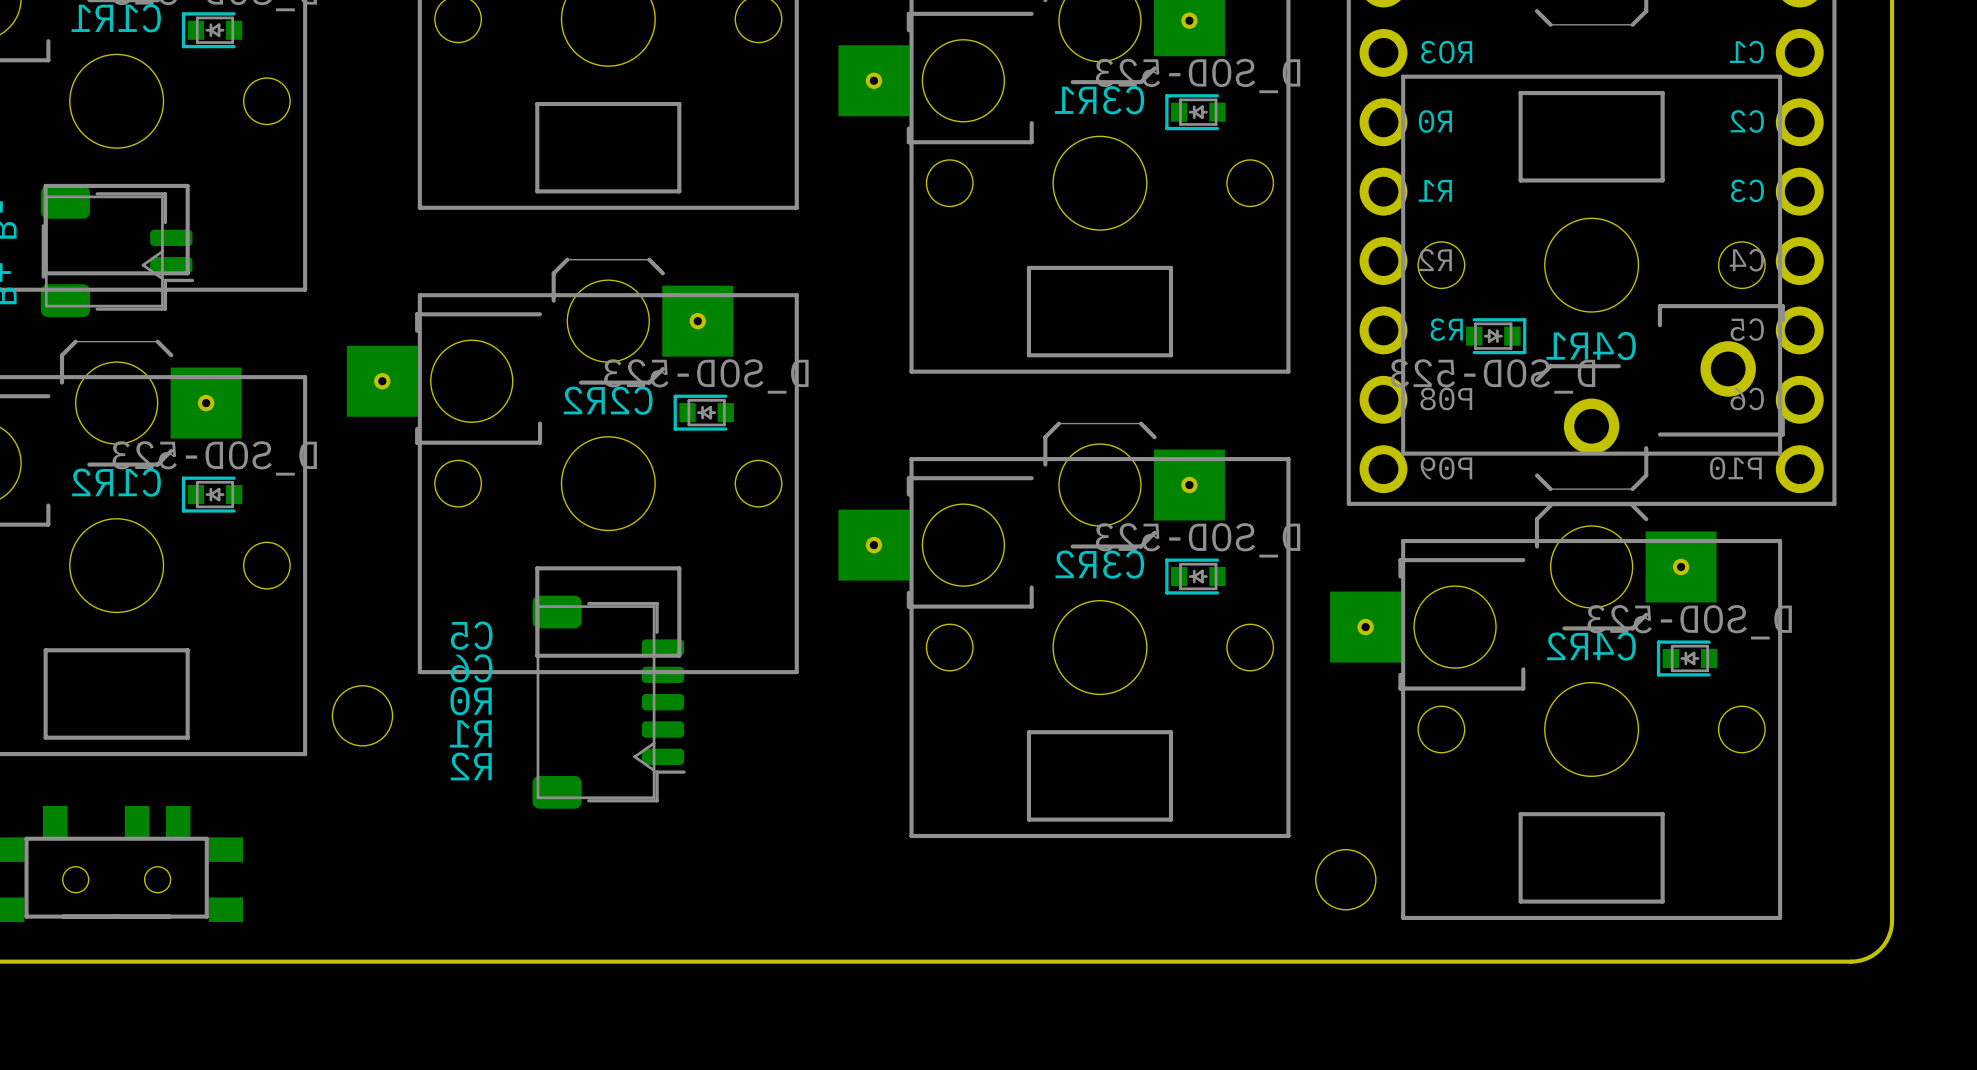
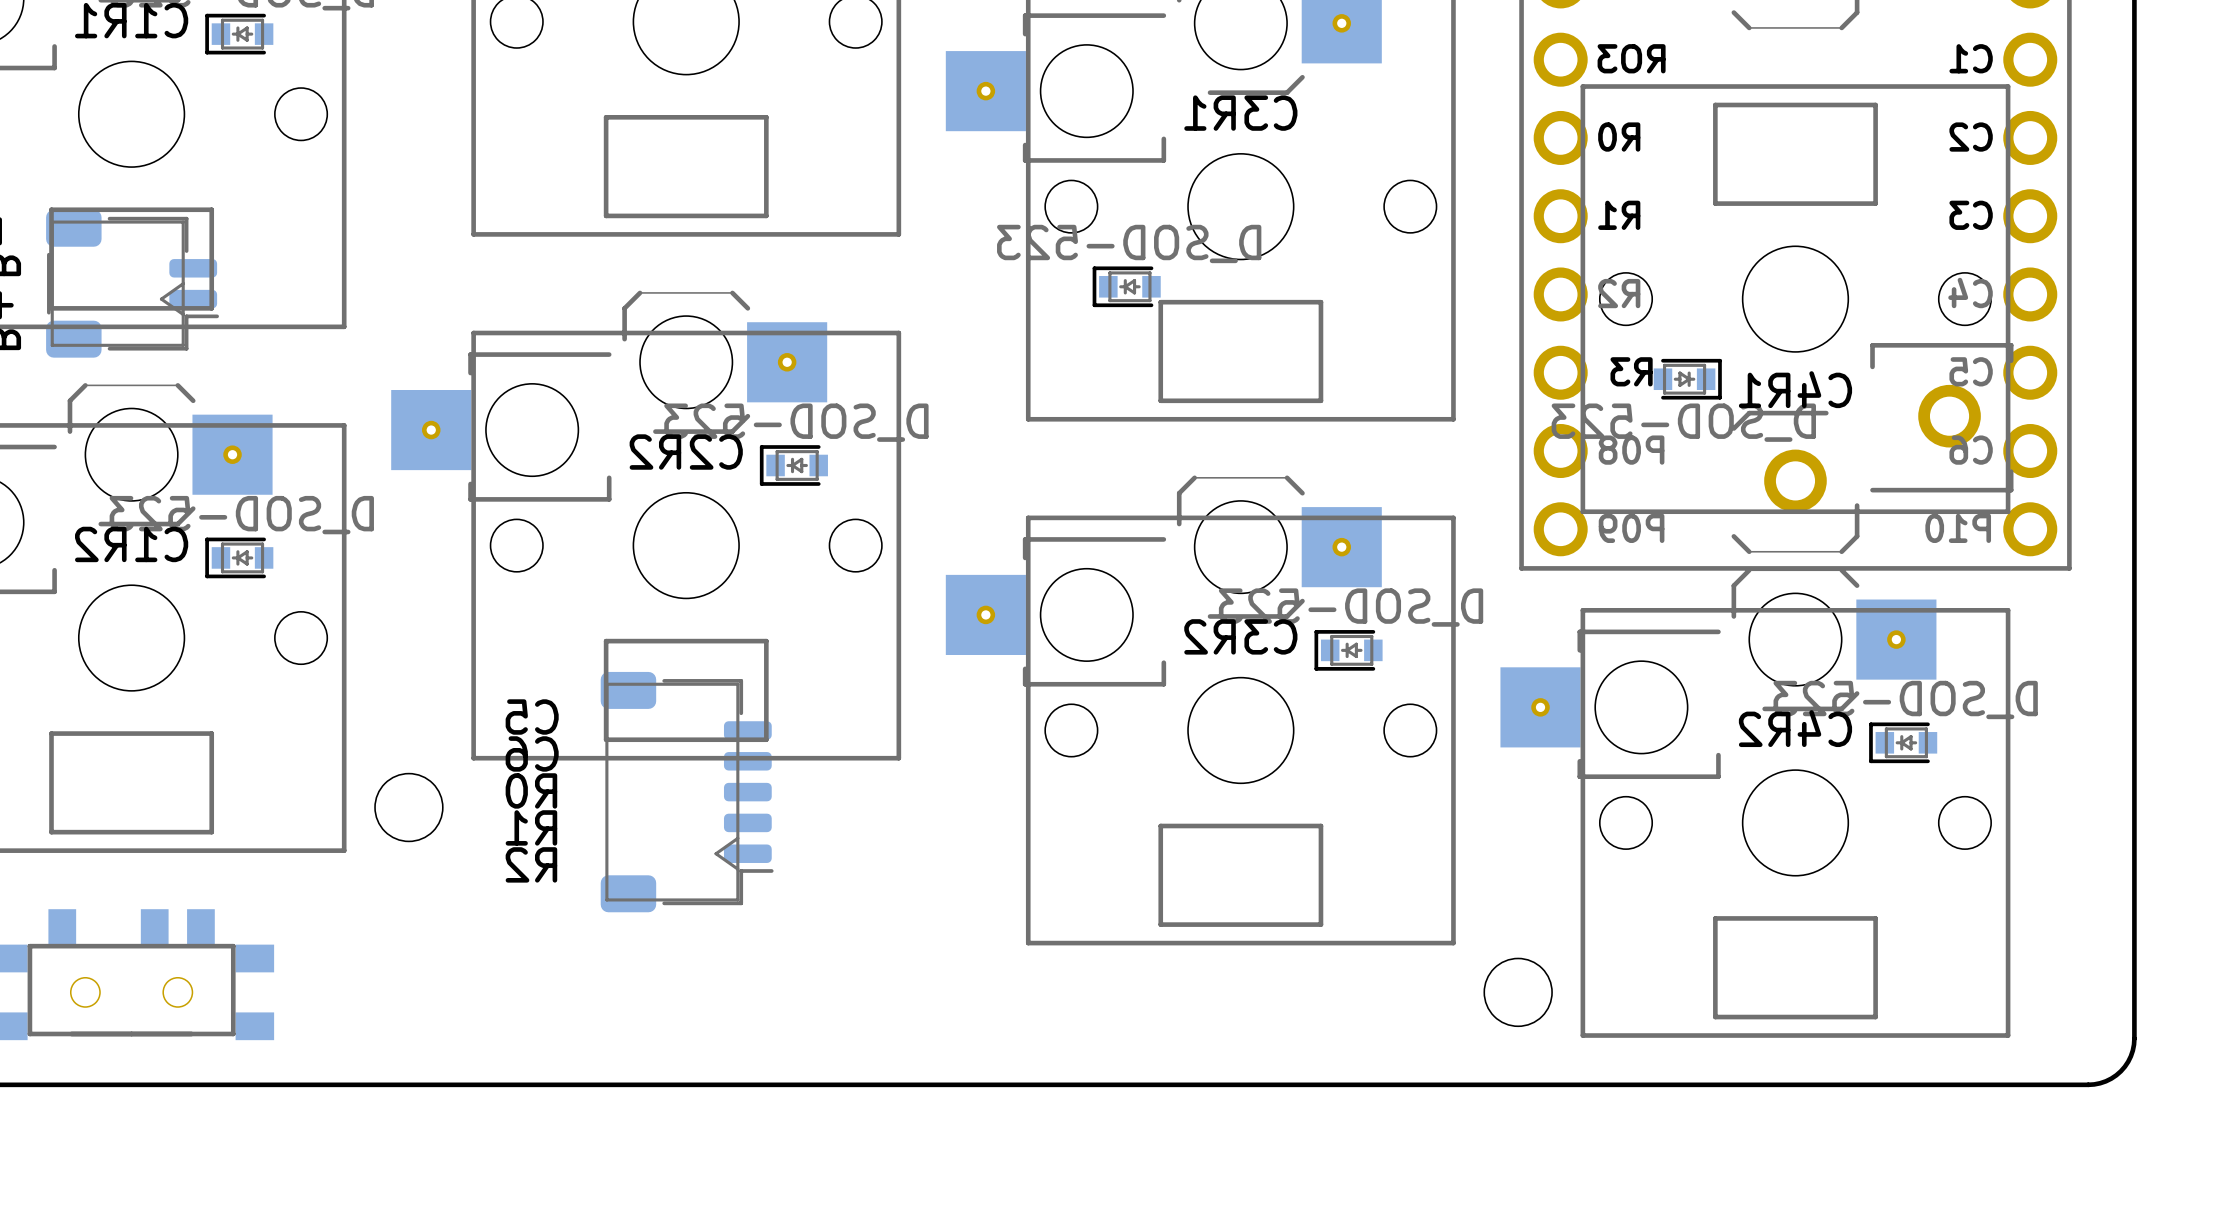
part position: (1195, 112) -> (1126, 286)

